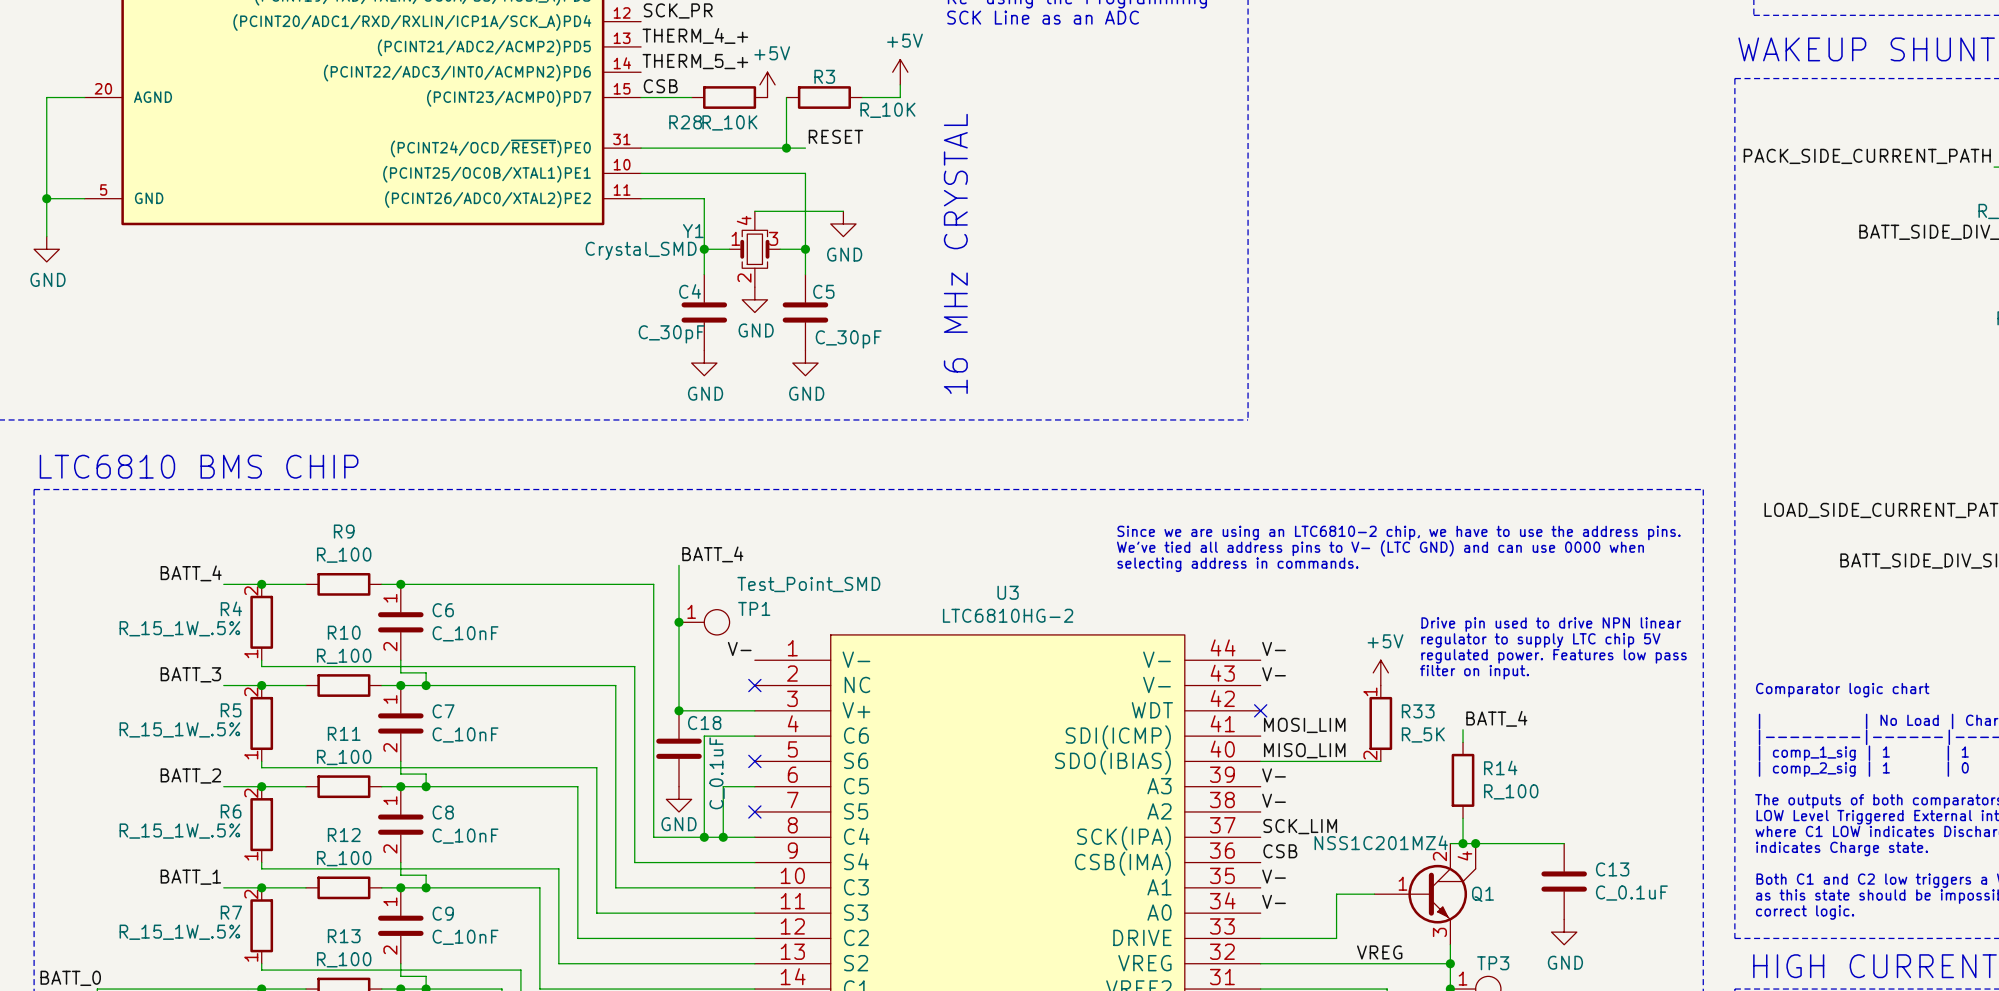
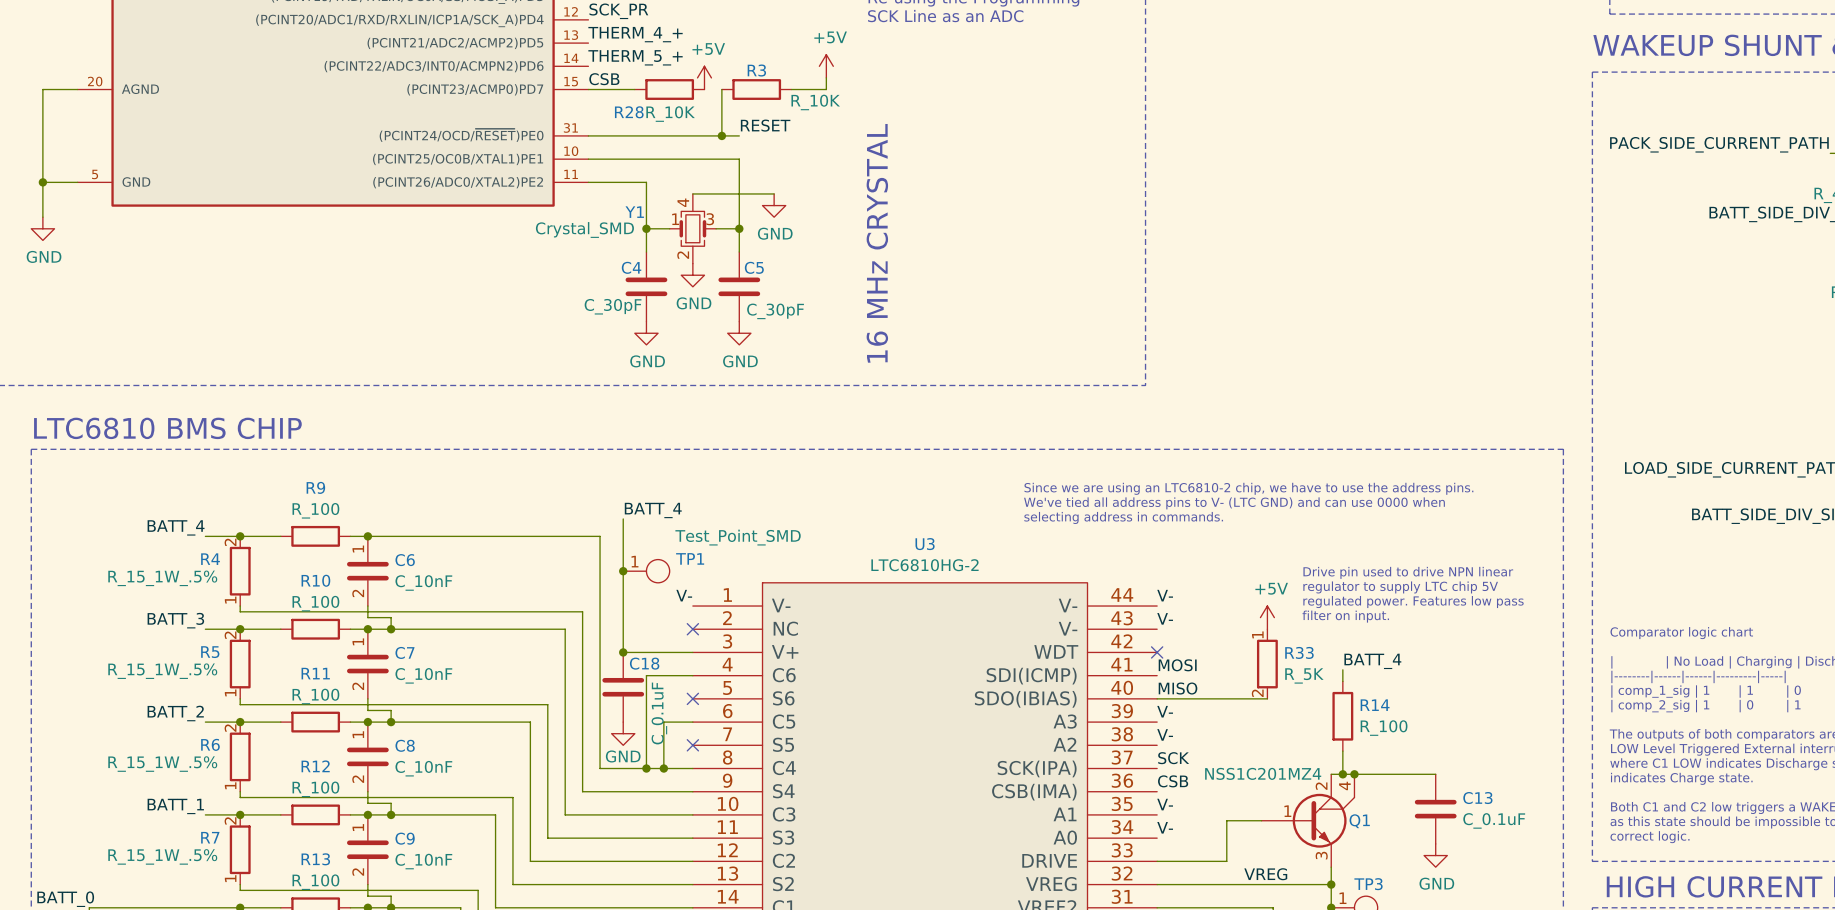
label: MOSI_LIM (1304, 725) -> MOSI (1177, 665)
label: MISO_LIM (1304, 750) -> MISO (1178, 688)
label: SCK_LIM (1300, 826) -> SCK (1173, 758)

